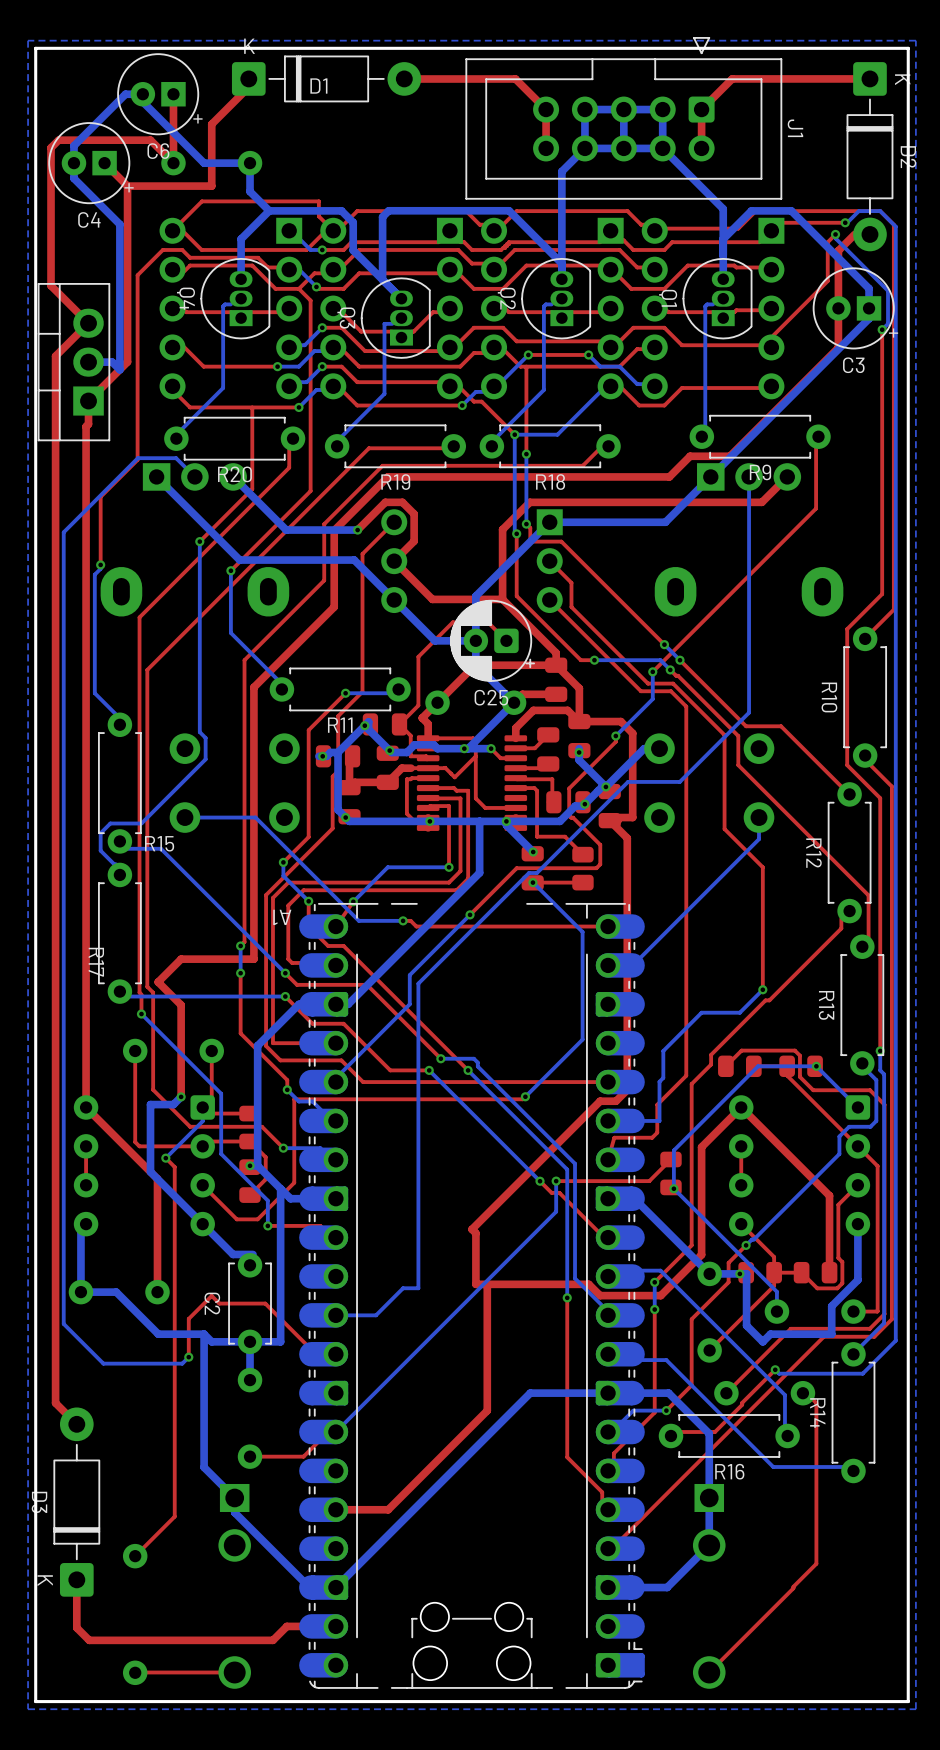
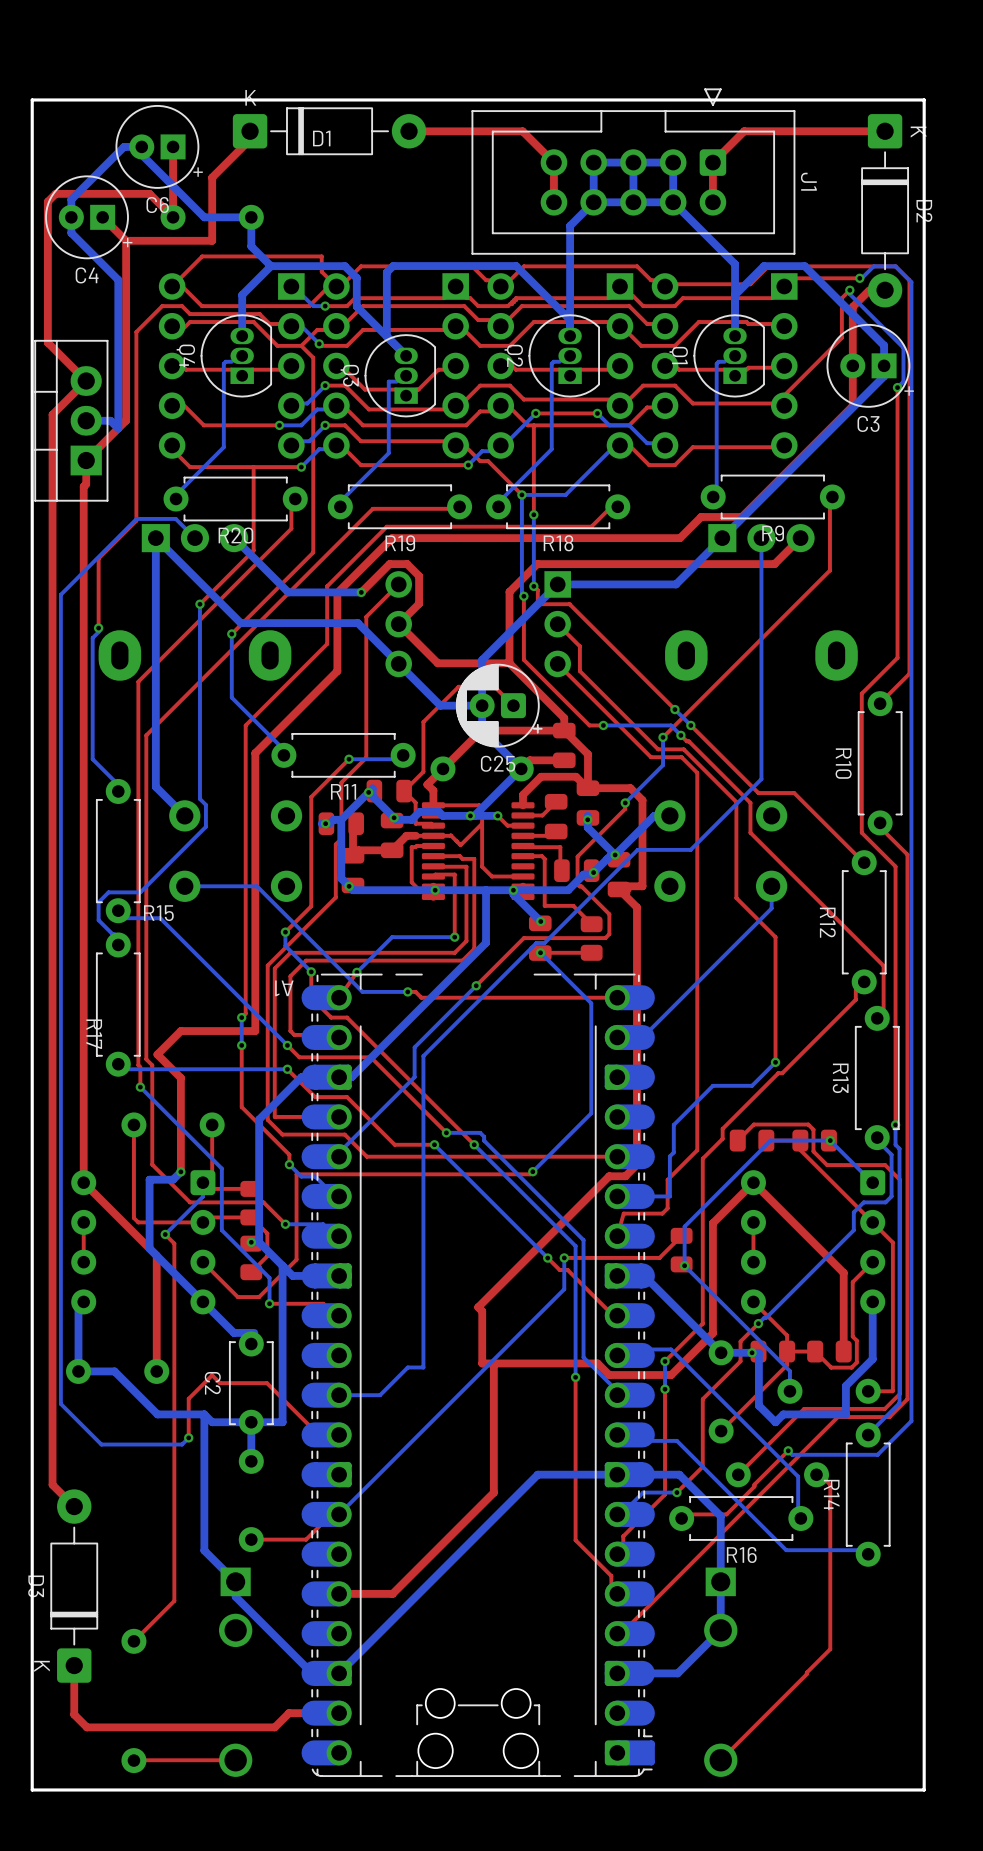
bottom zone outline: (915, 40) (28, 40) (28, 1709) (915, 1709) (915, 40) -> none
bottom track: none -> (155, 538) (155, 786) (184, 815)

